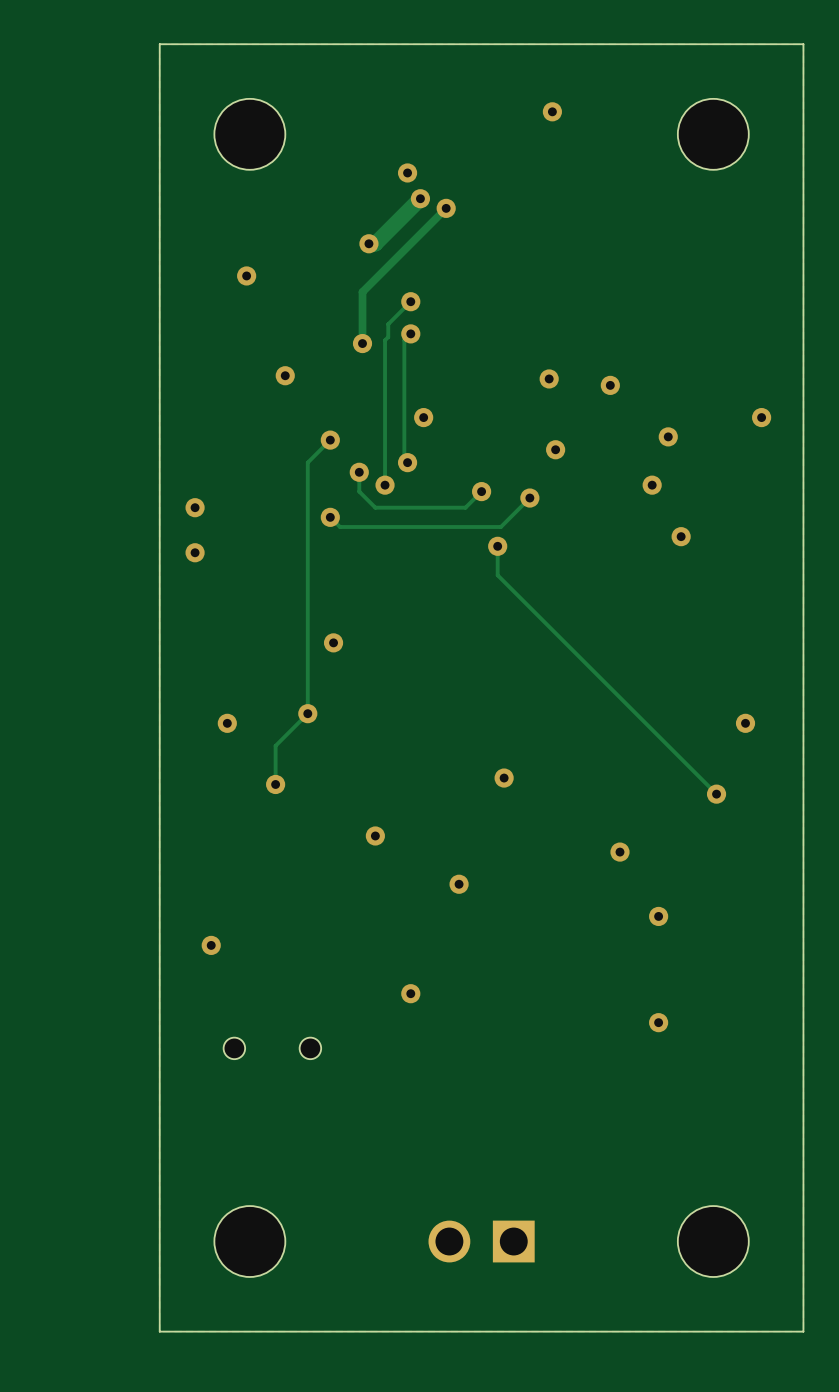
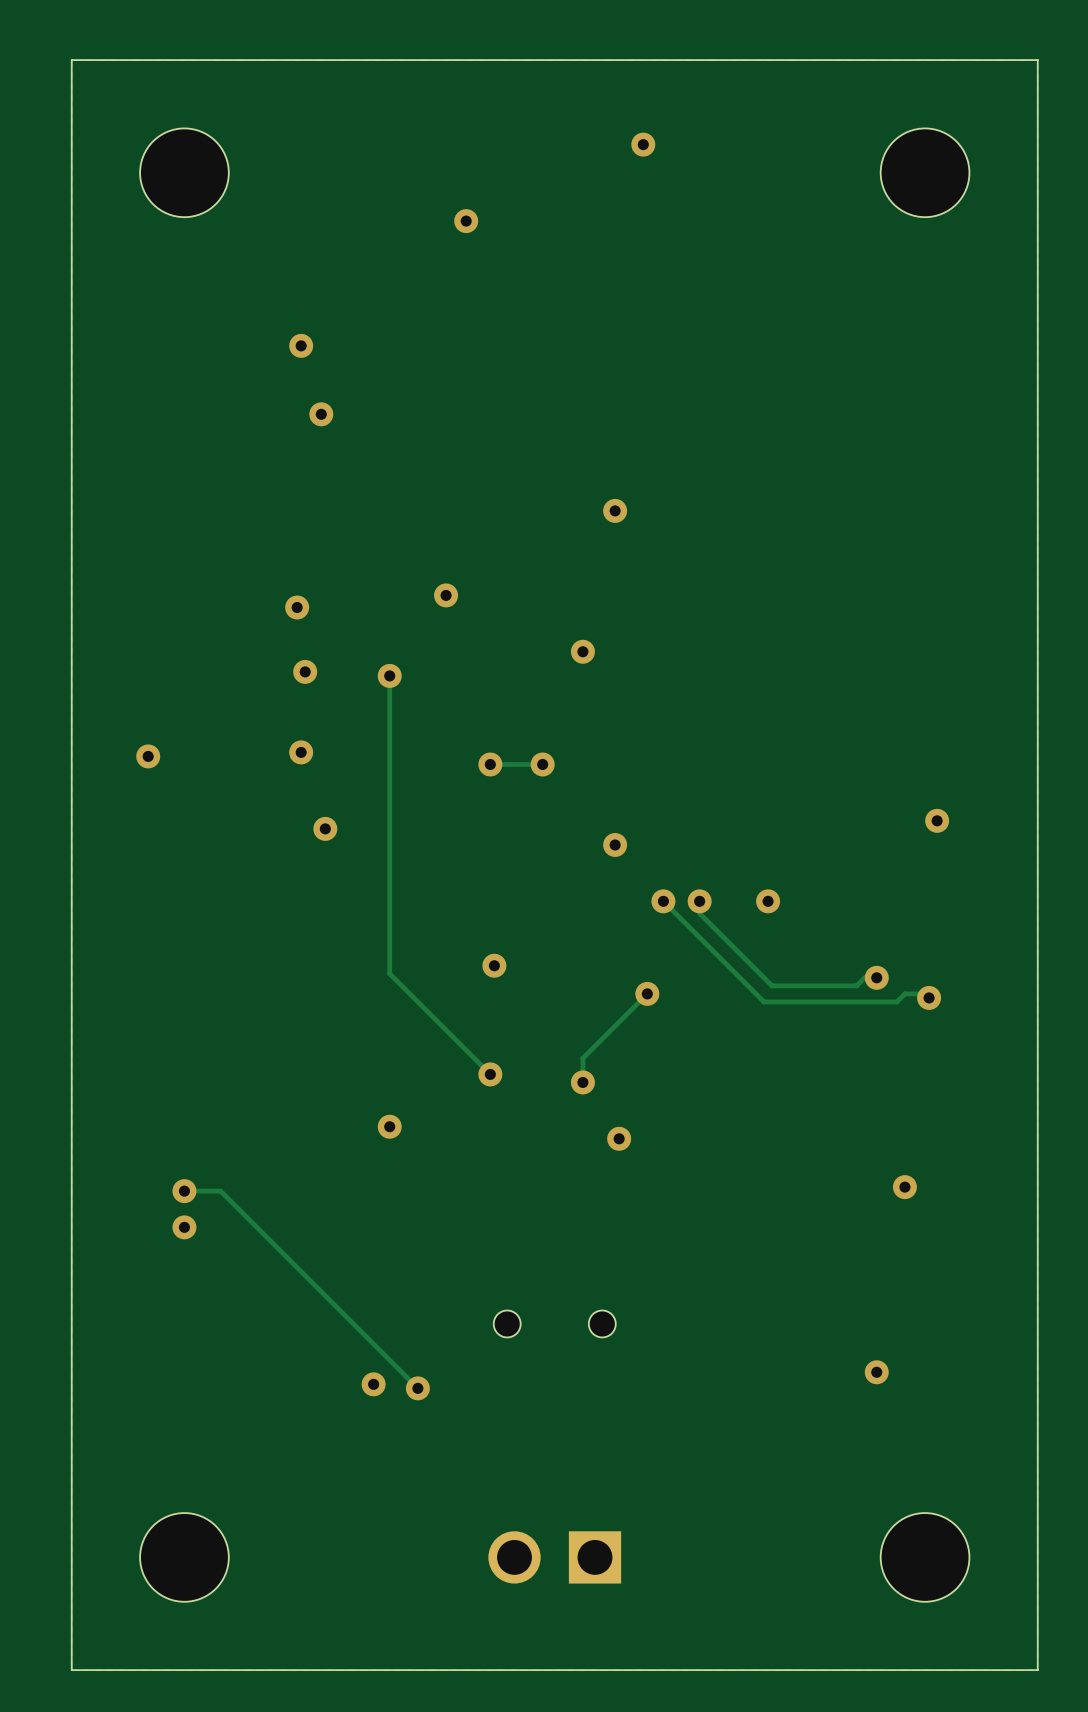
board edge: (159, 44) (159, 1331) -> (232, 60) (71, 60) (71, 1670) (232, 1670)
via: none -> (643, 144)
via: (552, 111) -> none
part position: (249, 134) -> (184, 172)
via: none -> (466, 221)
via: (407, 172) -> none
track: (420, 198) (375, 243) (368, 243) -> none
via: (420, 198) -> none
track: (446, 208) (362, 292) (362, 343) -> none
via: (446, 208) -> none
via: (368, 243) -> none
via: none -> (301, 345)
via: (246, 275) -> none
track: (410, 301) (388, 324) (388, 337) (385, 340) (385, 485) -> none
via: (410, 301) -> none
via: none -> (321, 414)
track: (410, 333) (404, 340) (404, 459) (407, 462) -> none
via: (410, 333) -> none
via: (362, 343) -> none
via: (285, 375) -> none
via: (549, 378) -> none
via: (610, 385) -> none
via: none -> (615, 510)
via: (423, 417) -> none
via: (761, 417) -> none
via: (668, 436) -> none
track: (330, 440) (307, 462) (307, 713) (275, 745) (275, 784) -> none
via: (330, 440) -> none
via: (555, 449) -> none
via: (407, 462) -> none
via: none -> (446, 595)
track: (359, 472) (359, 491) (375, 507) (465, 507) (481, 491) -> none
via: (359, 472) -> none
via: none -> (297, 607)
via: (385, 485) -> none
via: (652, 485) -> none
via: (481, 491) -> none
track: (529, 498) (500, 527) (339, 527) (330, 517) -> none
via: (529, 498) -> none
via: (195, 507) -> none
via: (330, 517) -> none
via: none -> (582, 651)
via: none -> (305, 671)
track: none -> (389, 675) (389, 973) (490, 1074)
via: none -> (389, 675)
via: (681, 536) -> none
track: (497, 546) (497, 575) (716, 794) -> none
via: (497, 546) -> none
via: (195, 552) -> none
via: none -> (301, 752)
via: none -> (148, 756)
via: none -> (490, 764)
track: none -> (542, 764) (490, 764)
via: none -> (542, 764)
via: (333, 642) -> none
via: none -> (937, 820)
via: none -> (325, 828)
via: none -> (615, 844)
via: (307, 713) -> none
track: none -> (663, 901) (764, 1001) (896, 1001) (904, 993) (925, 993)
via: none -> (663, 901)
track: none -> (699, 901) (699, 913) (772, 985) (856, 985) (864, 977) (876, 977)
via: none -> (699, 901)
via: none -> (768, 901)
via: (227, 723) -> none
via: (745, 723) -> none
via: none -> (494, 965)
via position: (504, 778) -> (647, 993)
via: none -> (876, 977)
via: (275, 784) -> none
track: none -> (647, 993) (582, 1058) (582, 1082)
via position: (375, 835) -> (490, 1074)
via: (619, 852) -> none
via: none -> (582, 1082)
via: (459, 884) -> none
via: none -> (389, 1126)
via: none -> (619, 1138)
via: (658, 916) -> none
via: (211, 945) -> none
via: none -> (904, 1187)
track: none -> (184, 1191) (220, 1191) (417, 1388)
via: none -> (184, 1191)
via: none -> (184, 1227)
via: (410, 993) -> none
via: (658, 1022) -> none
part position: (272, 1048) -> (554, 1323)
via: none -> (876, 1372)
via: none -> (373, 1384)
via: none -> (417, 1388)
part position: (249, 1241) -> (184, 1557)
part position: (481, 1241) -> (554, 1557)

